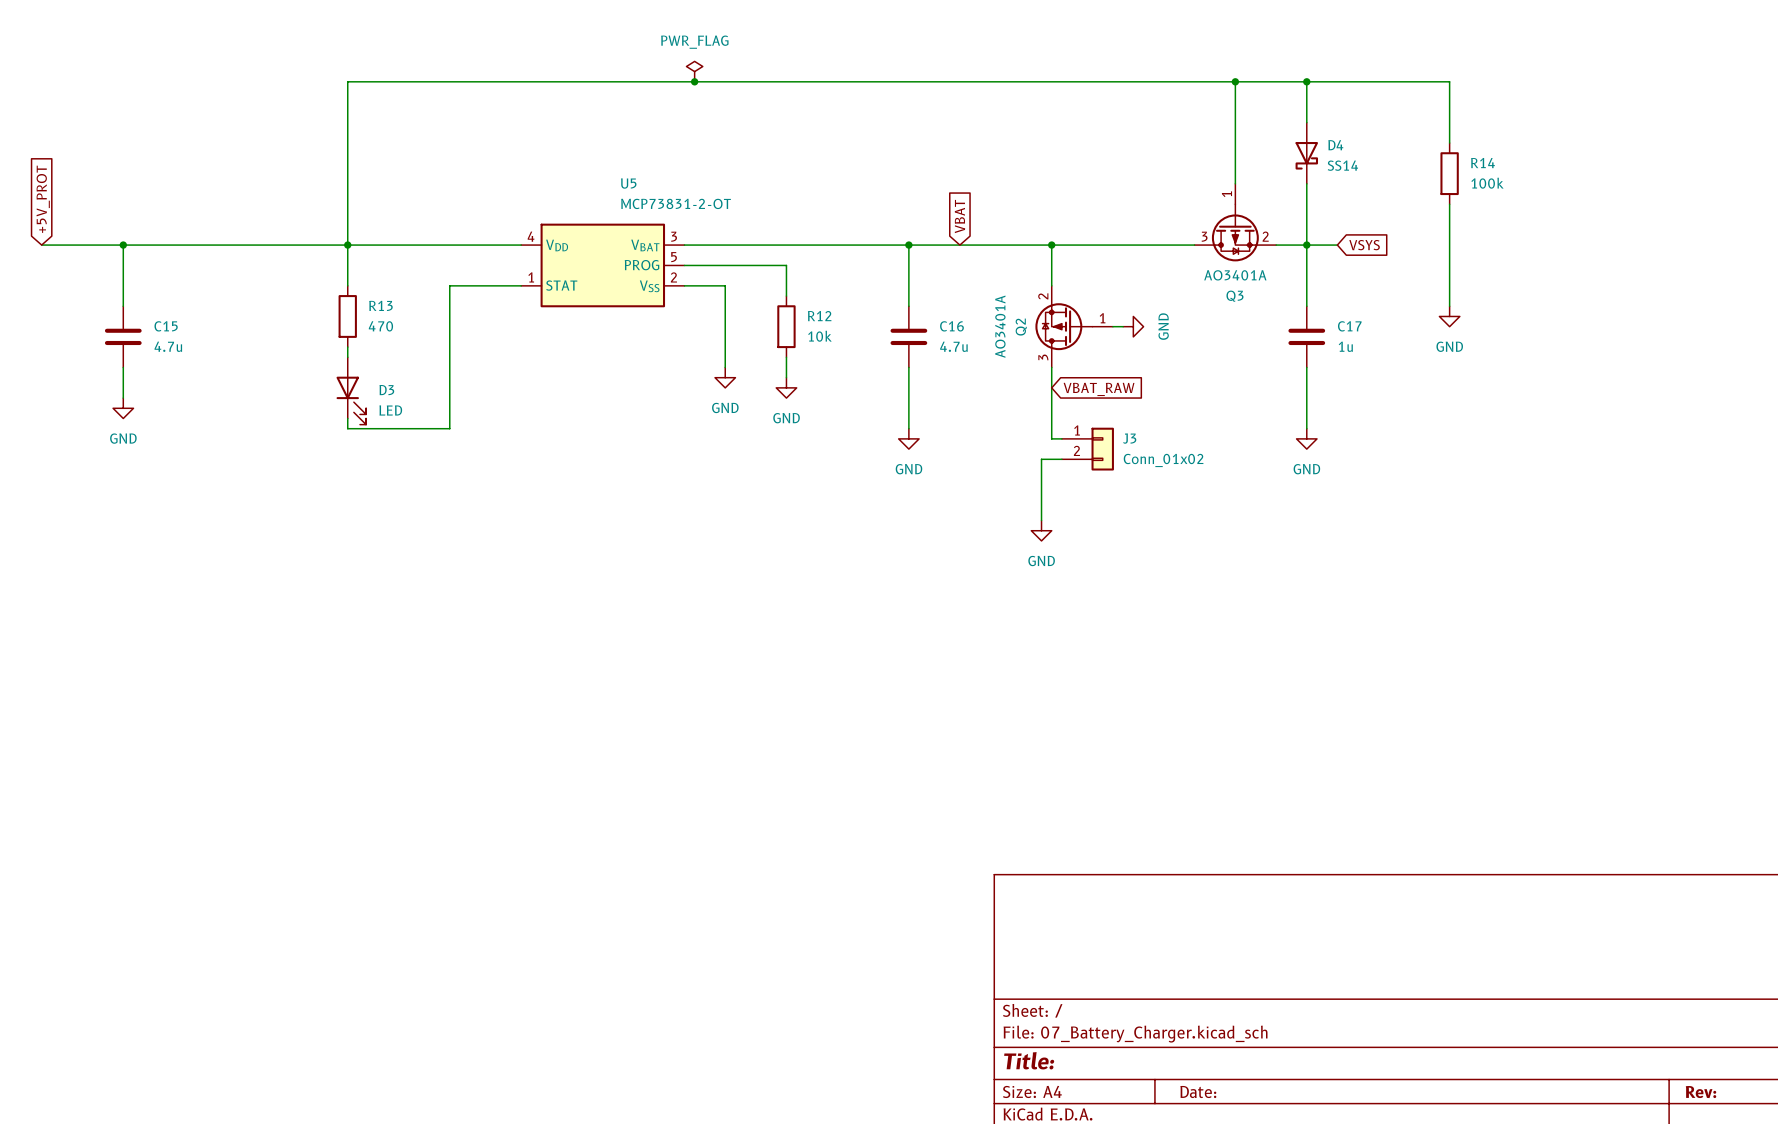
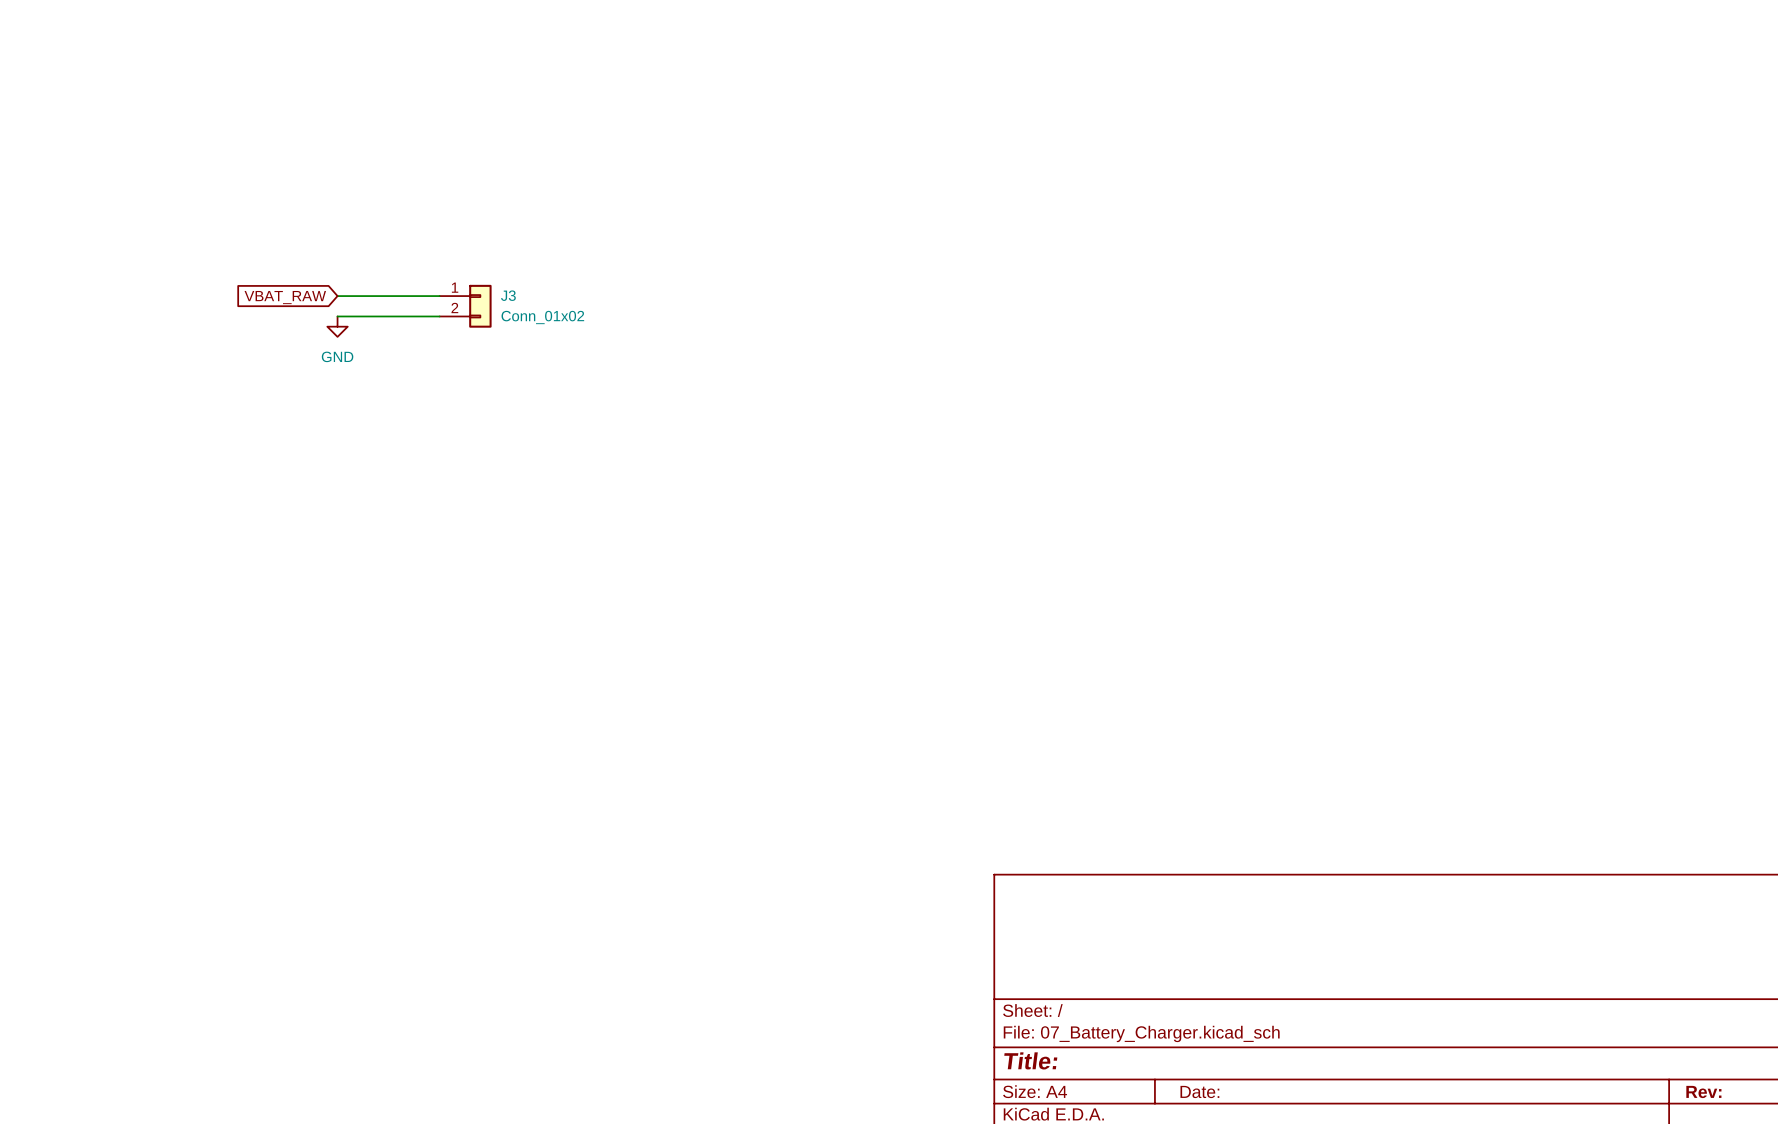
power symbol: PWR_FLAG (694, 71) -> none
junction: (694, 81) -> none
wire: (1235, 81) (1235, 183) -> none
junction: (1235, 81) -> none
wire: (1306, 81) (1306, 122) -> none
junction: (1306, 81) -> none
wire: (1449, 143) (1449, 81) (347, 81) (347, 285) -> none
D4: SS14 (1306, 153) -> none
R14: 100k (1449, 173) -> none
wire: (1306, 183) (1306, 306) -> none
global label: +5V_PROT (43, 199) -> none
wire: (1449, 204) (1449, 306) -> none
global label: VBAT (959, 216) -> none
Q3: AO3401A (1235, 222) -> none
wire: (41, 245) (521, 245) -> none
wire: (123, 245) (123, 306) -> none
junction: (123, 245) -> none
junction: (347, 245) -> none
wire: (684, 245) (1194, 245) -> none
wire: (908, 245) (908, 306) -> none
junction: (908, 245) -> none
wire: (1051, 245) (1051, 285) -> none
junction: (1051, 245) -> none
wire: (1276, 245) (1337, 245) -> none
junction: (1306, 245) -> none
global label: VSYS (1364, 245) -> none
U5: MCP73831-2-OT (602, 265) -> none
wire: (684, 265) (786, 265) (786, 296) -> none
wire: (521, 285) (449, 285) (449, 428) (347, 428) (347, 418) -> none
wire: (684, 285) (725, 285) (725, 367) -> none
wire: none -> (337, 296) (439, 296)
global label: none -> VBAT_RAW (285, 297)
wire: none -> (337, 316) (439, 316)
R13: 470 (347, 316) -> none
power symbol: GND (1449, 316) -> none
power symbol: none -> GND (337, 326)
R12: 10k (786, 326) -> none
Q2: AO3401A (1074, 326) -> none
wire: (1112, 326) (1123, 326) -> none
power symbol: GND (1133, 326) -> none
C15: 4.7u (123, 336) -> none
C16: 4.7u (908, 336) -> none
C17: 1u (1306, 336) -> none
wire: (347, 347) (347, 357) -> none
wire: (786, 357) (786, 377) -> none
wire: (123, 367) (123, 398) -> none
wire: (908, 367) (908, 428) -> none
wire: (1051, 367) (1051, 438) (1061, 438) -> none
wire: (1306, 367) (1306, 428) -> none
power symbol: GND (725, 377) -> none
power symbol: GND (786, 387) -> none
global label: VBAT_RAW (1099, 389) -> none
D3: LED (351, 390) -> none
power symbol: GND (123, 408) -> none
power symbol: GND (908, 438) -> none
power symbol: GND (1306, 438) -> none
J3 position: (1087, 449) -> (465, 306)
wire: (1061, 459) (1041, 459) (1041, 520) -> none
power symbol: GND (1041, 530) -> none

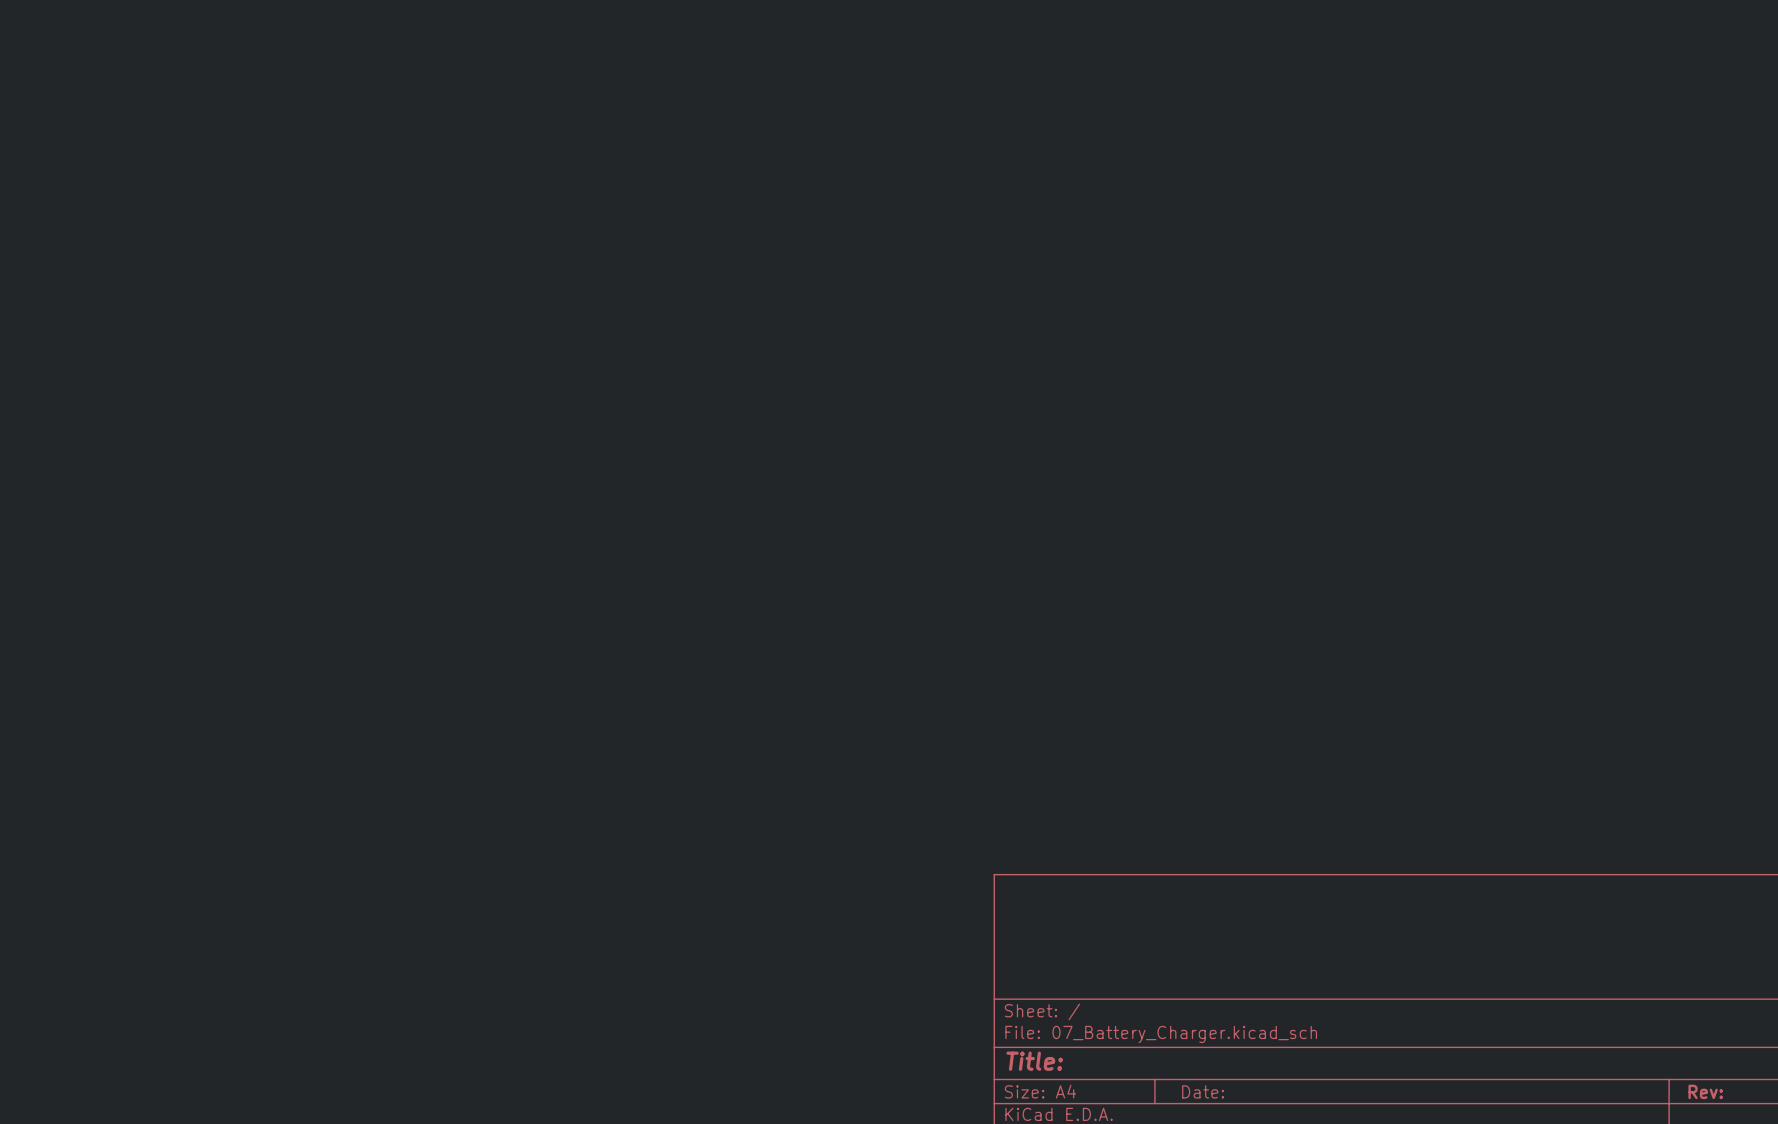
wire: (337, 296) (439, 296) -> none
global label: VBAT_RAW (285, 297) -> none
J3: Conn_01x02 (465, 306) -> none
wire: (337, 316) (439, 316) -> none
power symbol: GND (337, 326) -> none

